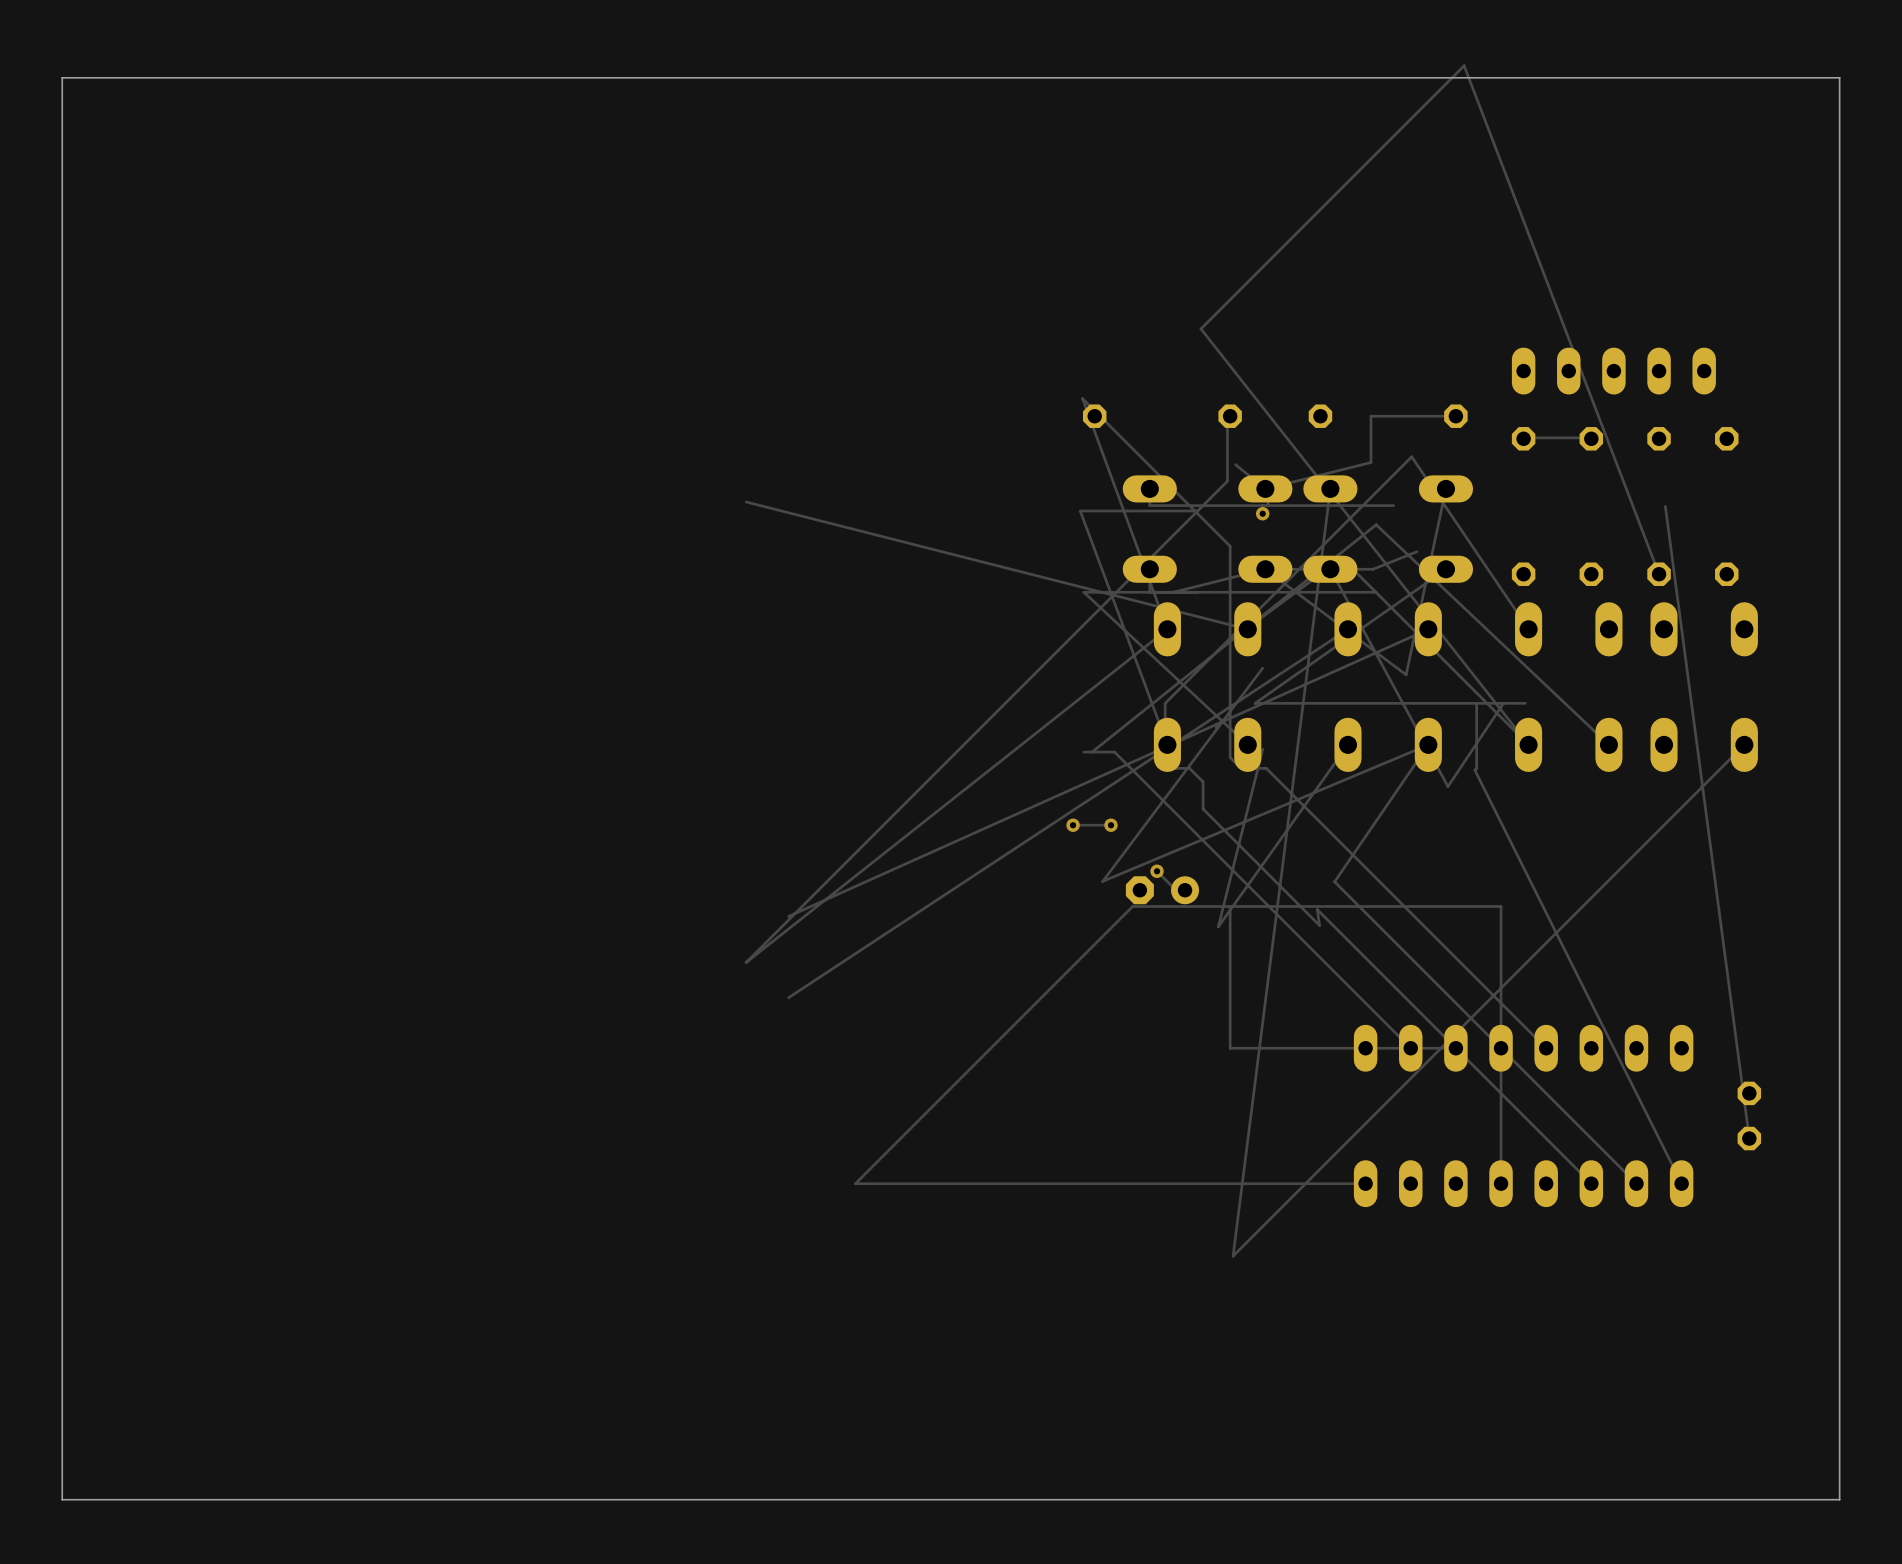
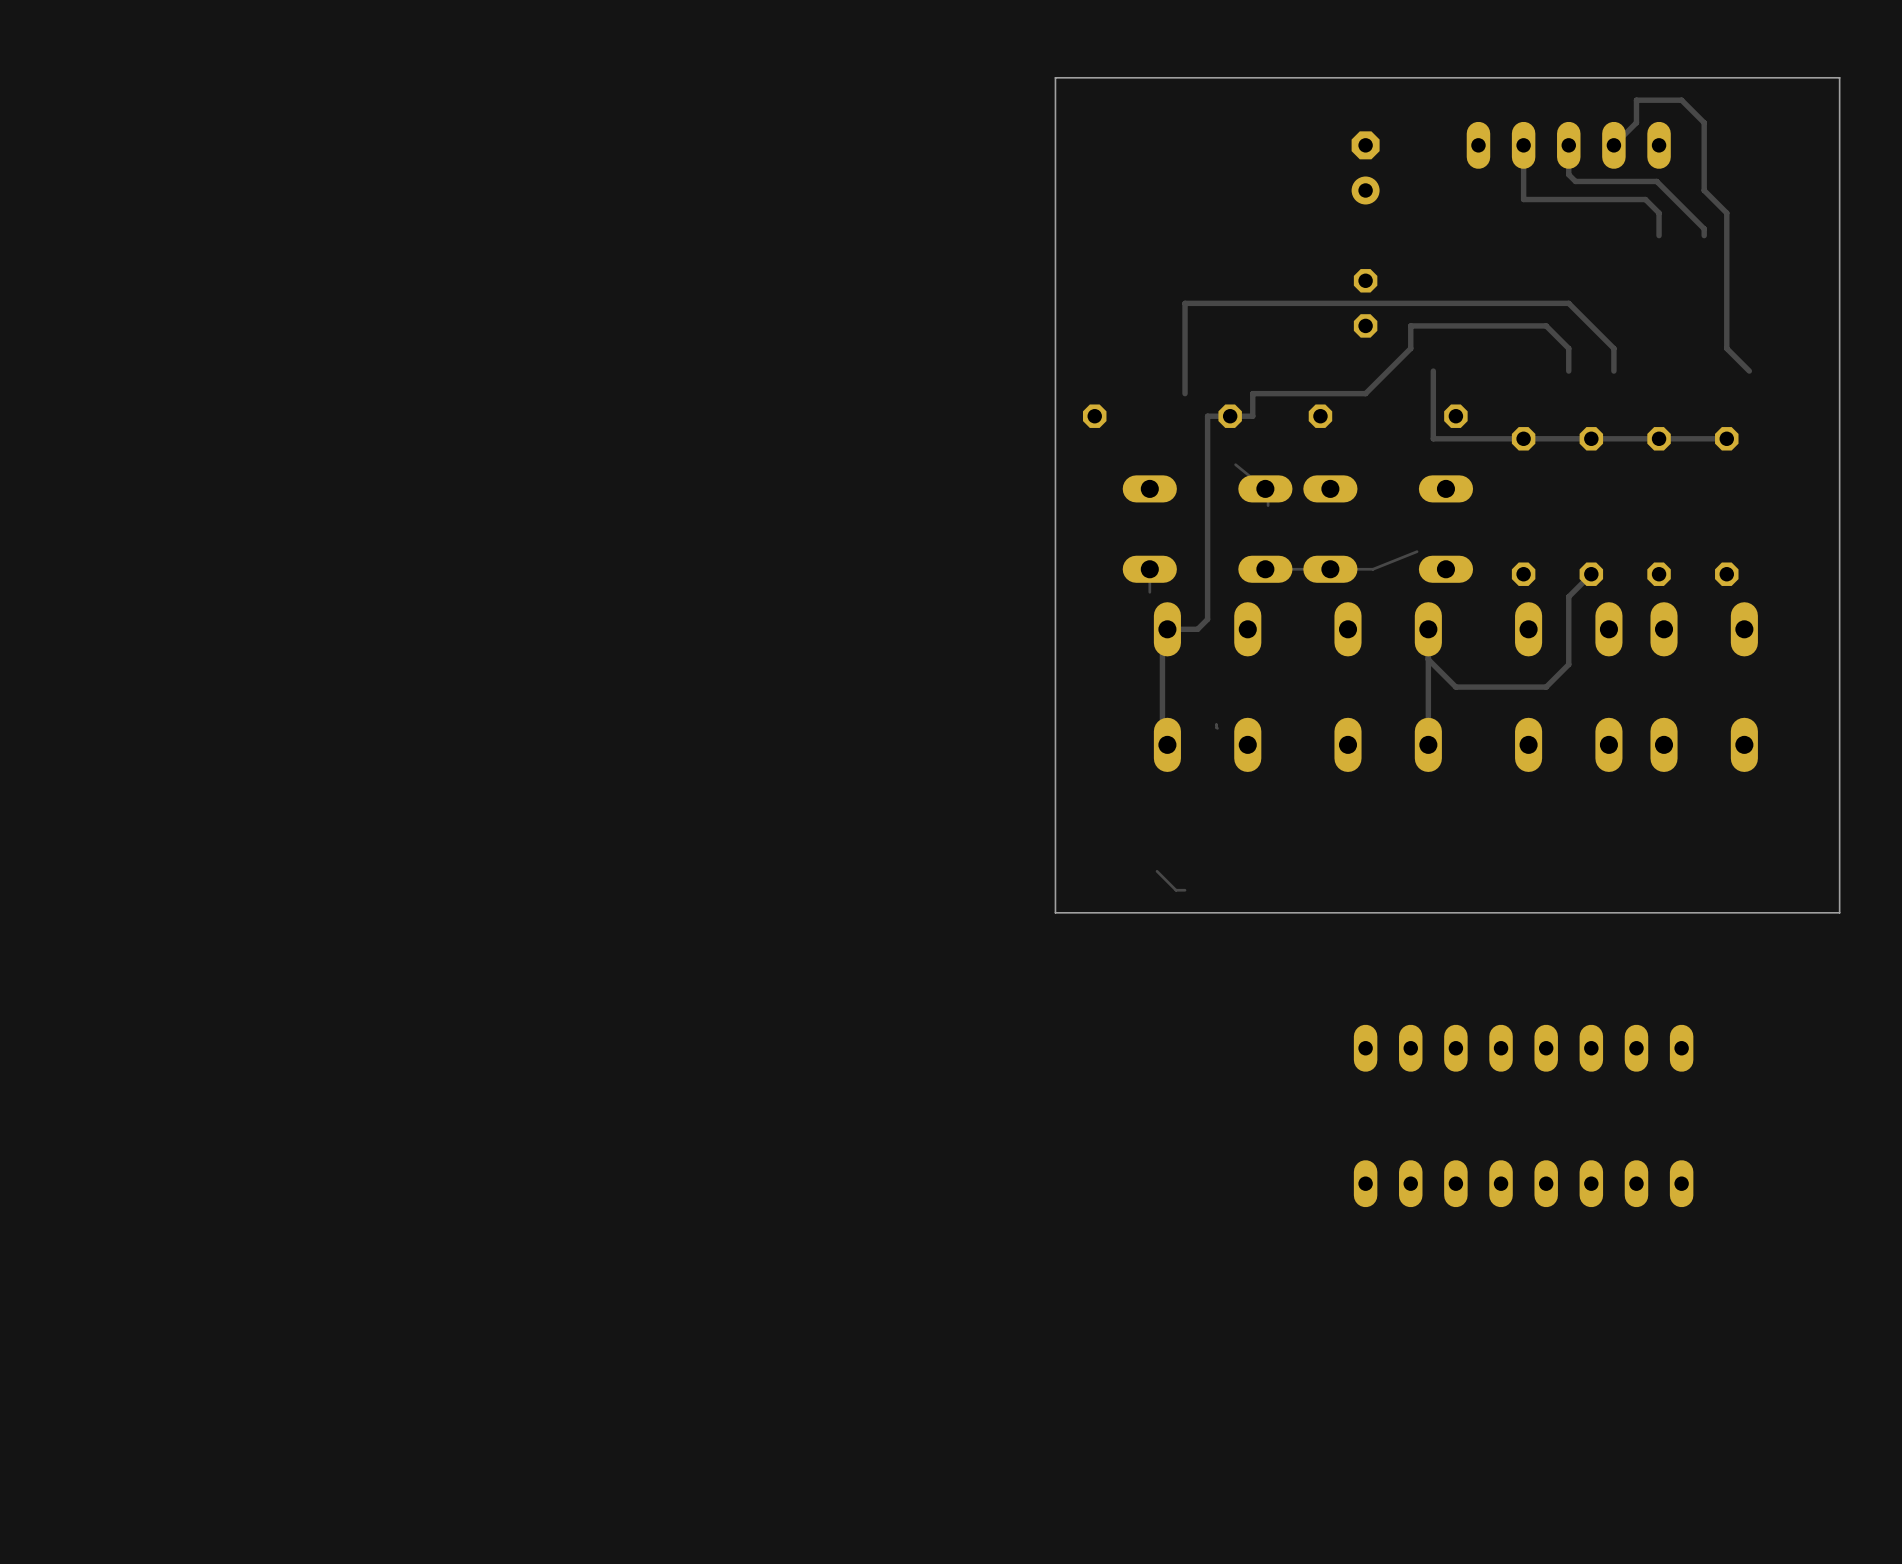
board edge: (1055, 77) (62, 77) (62, 1499) (1839, 1499) (1839, 912) -> (1055, 77) (1055, 912) (1839, 912)
track: none -> (1523, 145) (1523, 199) (1645, 199) (1659, 213) (1659, 235)
track: none -> (1568, 145) (1568, 174) (1575, 181) (1656, 181) (1704, 228) (1704, 235)
track: none -> (1613, 145) (1636, 122) (1636, 100) (1681, 100) (1704, 122) (1704, 190) (1726, 213) (1726, 348) (1749, 371)
part: none -> (1365, 167)
part: none -> (1365, 303)
track: none -> (1433, 371) (1433, 438) (1726, 438)
track: none -> (1568, 371) (1568, 348) (1546, 325) (1410, 325) (1410, 348) (1365, 393) (1252, 393) (1252, 416) (1230, 416)
track: none -> (1613, 371) (1613, 348) (1568, 303) (1185, 303) (1185, 393)
part position: (1613, 371) -> (1568, 145)
track: (1227, 416) (1227, 481) (746, 962) (1167, 629) (1082, 398) (1230, 546) (1230, 757) (1241, 768) (1266, 768) (1546, 1048) -> none
track: (1455, 416) (1371, 416) (1371, 462) (1265, 488) -> none
track: (1149, 488) (1149, 505) (1393, 505) -> none
track: (1330, 488) (1233, 1256) (1744, 744) -> none
track: (1445, 488) (1406, 674) (1265, 569) (1173, 592) -> none
track: (746, 501) (1247, 629) -> none
track: (1665, 506) (1749, 1138) -> none
track: (1197, 511) (1080, 511) (1167, 744) -> (1227, 416) (1207, 416) (1207, 619) (1197, 629) (1167, 629) (1162, 634) (1162, 739) (1167, 744)
via: (1262, 513) -> none
track: (1330, 569) (1447, 786) (1503, 703) -> none
track: (1445, 569) (1255, 703) (1525, 703) -> none
track: none -> (1591, 574) (1568, 596) (1568, 664) (1546, 687) (1455, 687) (1428, 659)
track: (1659, 574) (1464, 65) (1200, 328) (1528, 744) (1341, 558) (1220, 648) -> none
track: (1376, 592) (1083, 592) (1247, 744) -> none
track: (1428, 629) (788, 916) -> (1428, 629) (1428, 744)
track: (1528, 629) (1411, 456) (1165, 703) (1165, 757) (1175, 768) (1189, 768) (1203, 781) (1203, 808) (1319, 925) (1317, 909) (1591, 1183) -> none
track: (1346, 630) (1348, 629) (788, 997) -> none
track: (1262, 668) (1102, 881) (1428, 744) (1334, 881) (1636, 1183) -> none
track: (1476, 703) (1476, 768) (1474, 770) (1681, 1183) -> none
track: (1348, 744) (1218, 926) (1262, 749) -> none
track: (1608, 744) (1376, 524) (1092, 752) -> none
track: (1083, 752) (1114, 752) (1410, 1048) (1408, 1048) -> none
via: (1073, 825) -> none
track: (1110, 825) (1073, 825) -> none
via: (1110, 825) -> none
via: (1157, 871) -> none
part: (1162, 890) -> none
track: (1230, 906) (1230, 1048) (1455, 1048) -> none
part: (1749, 1115) -> none
track: (1501, 1183) (1501, 906) (1132, 906) (855, 1183) (1365, 1183) -> none

